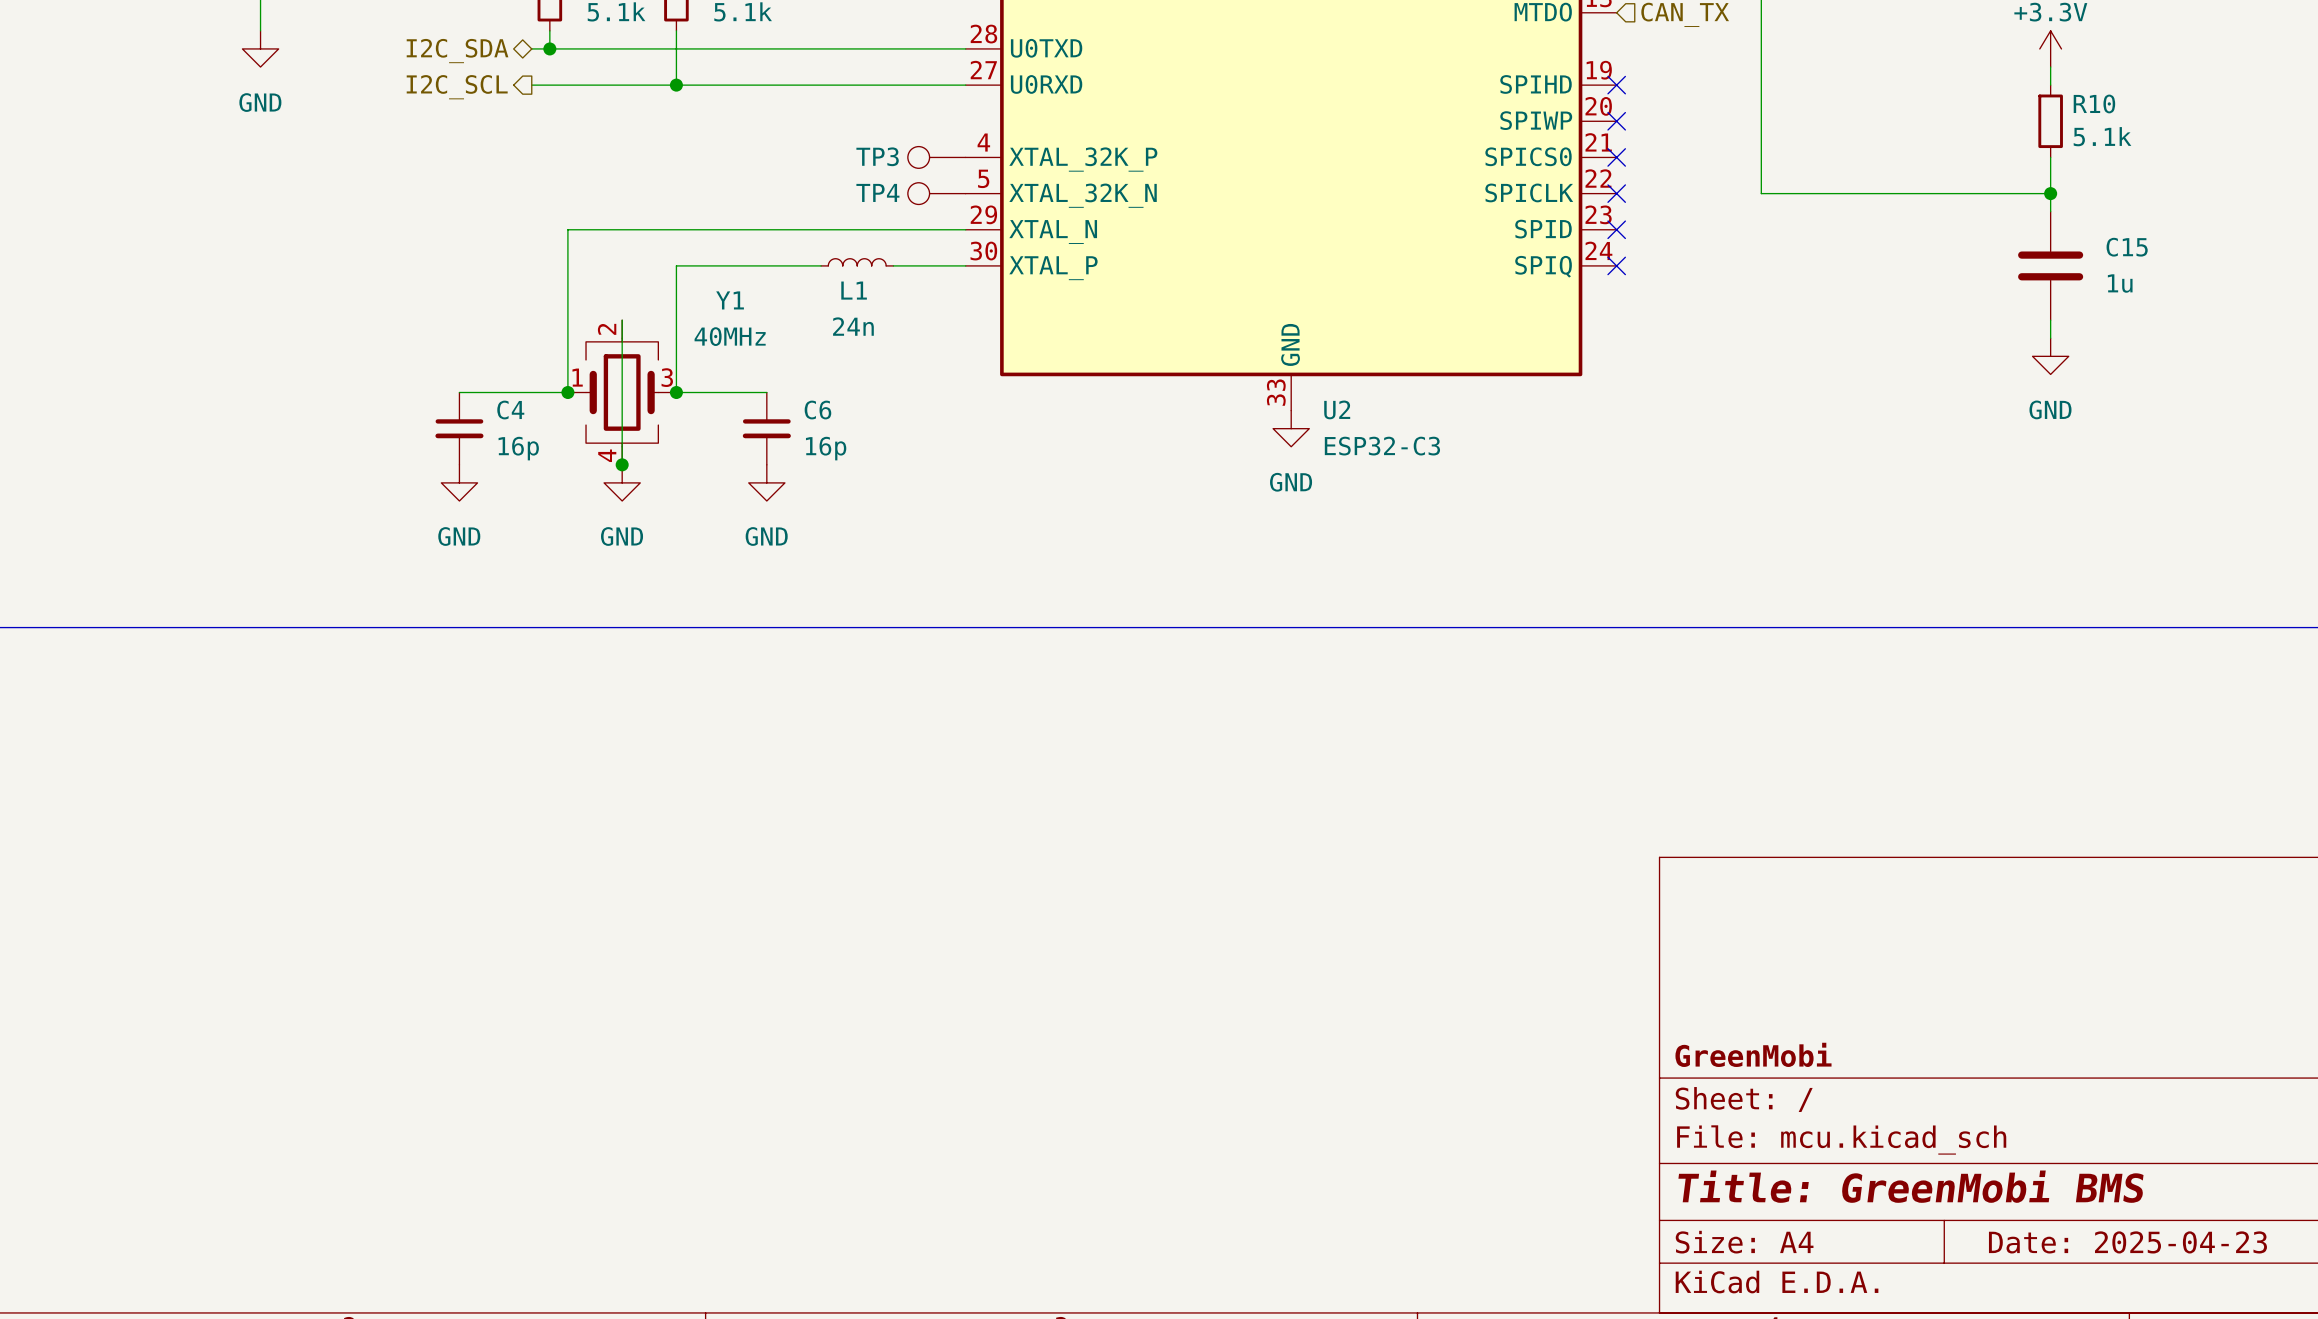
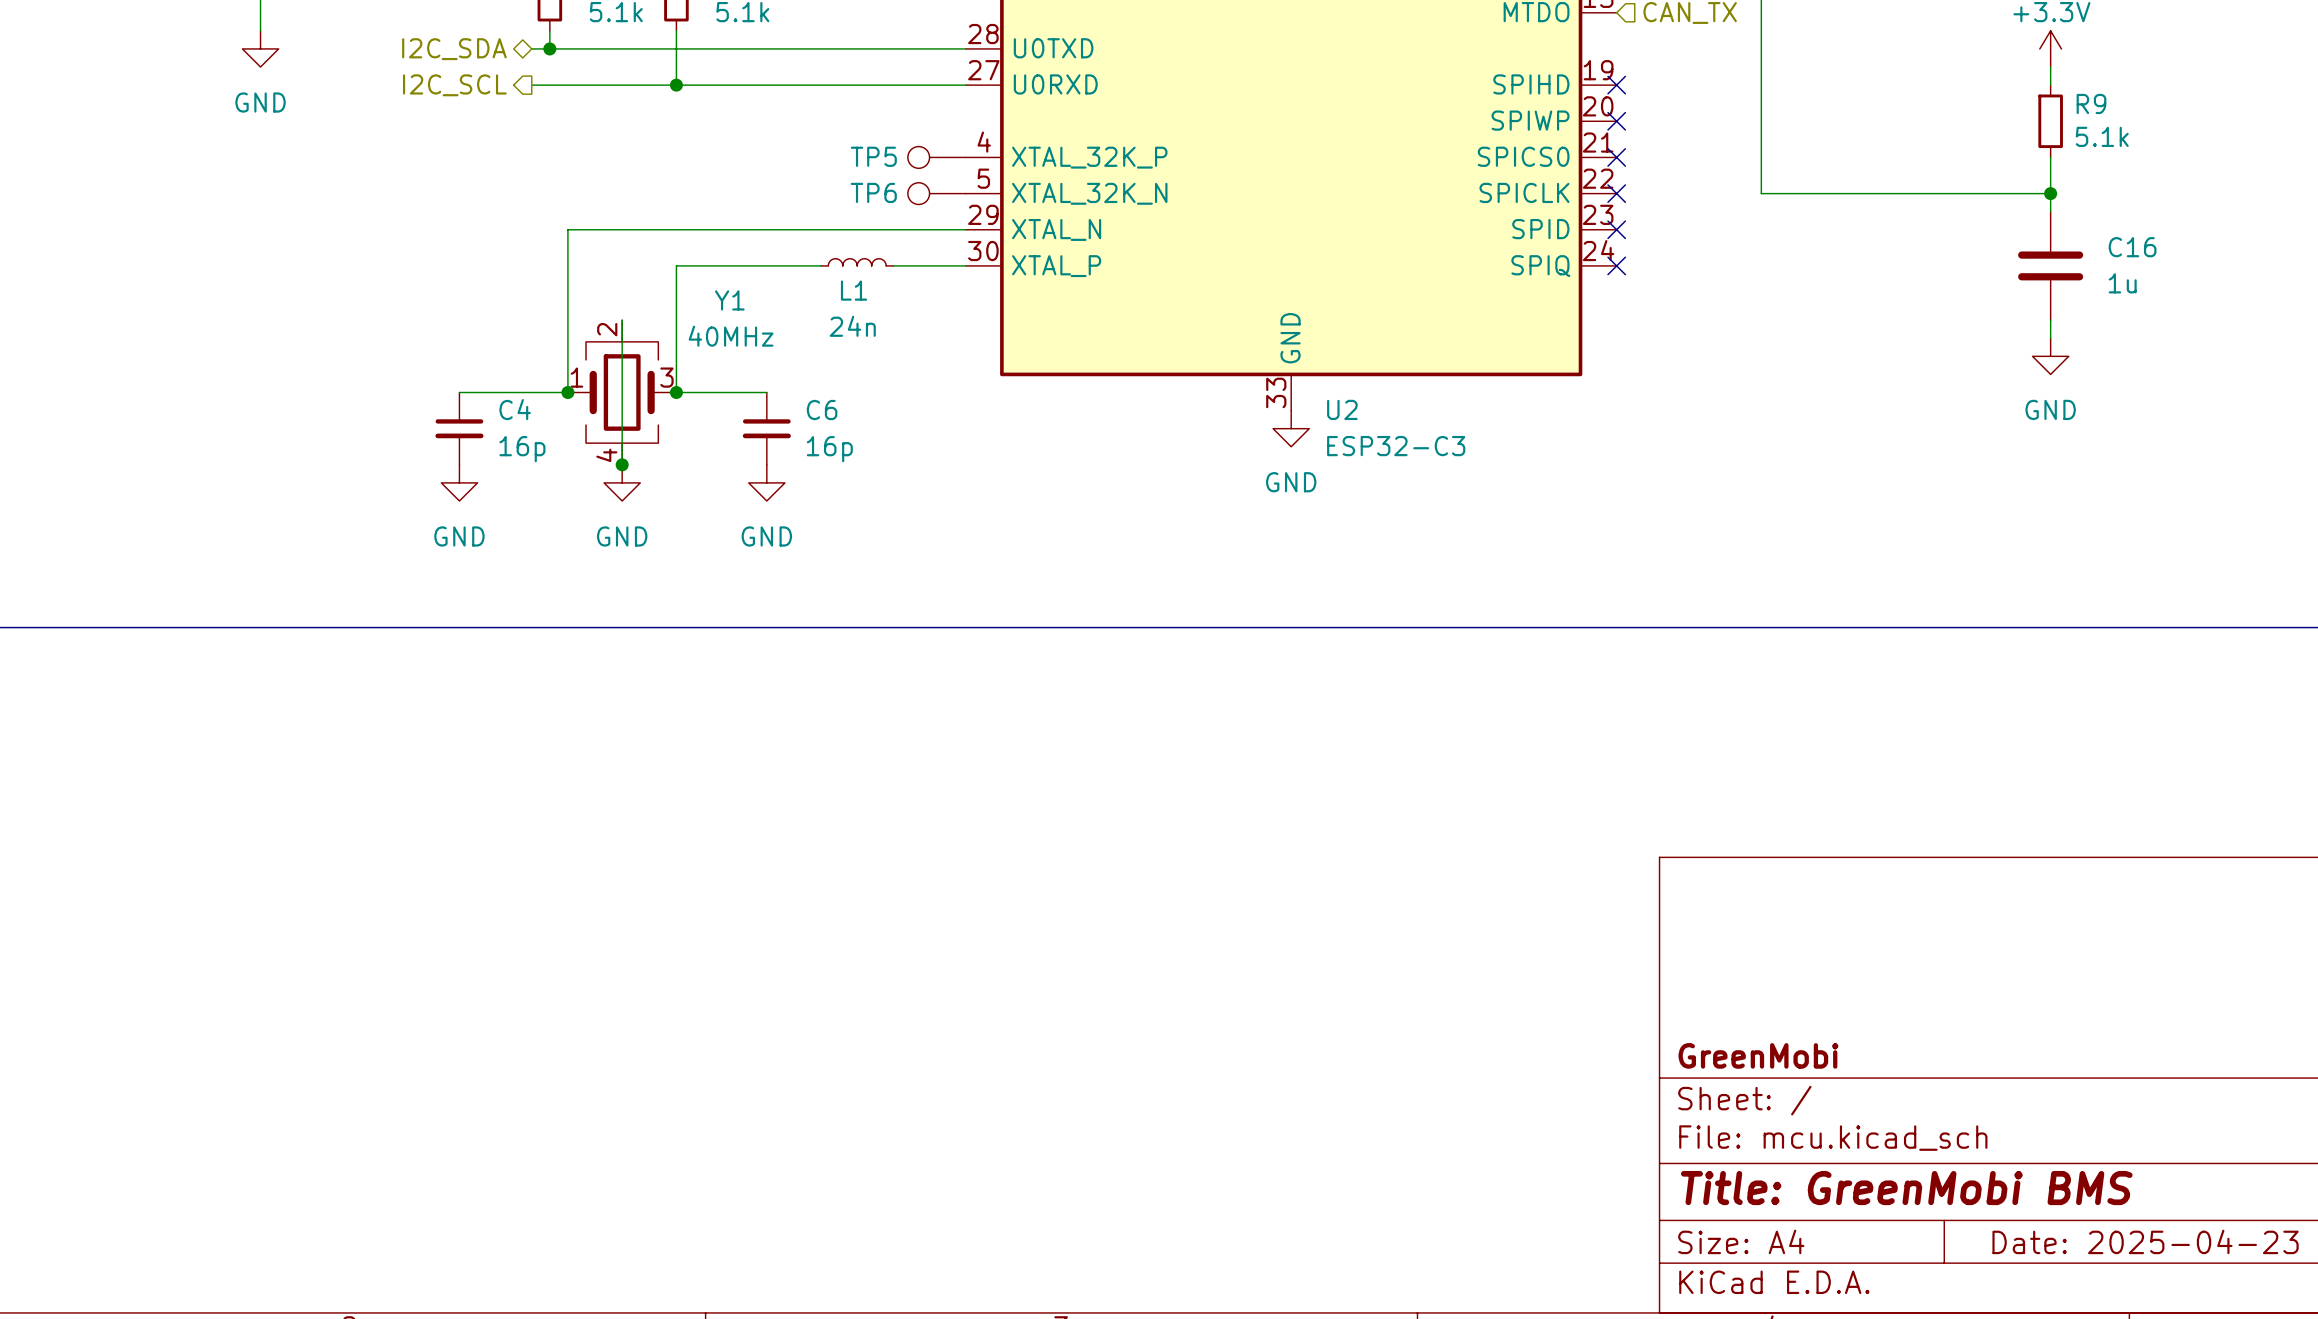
R10 name: R10 (2094, 103) -> R9 (2091, 103)
TP3 name: TP3 (877, 156) -> TP5 (873, 156)
TP4 name: TP4 (877, 192) -> TP6 (873, 192)
C15 name: C15 (2127, 247) -> C16 (2132, 247)

